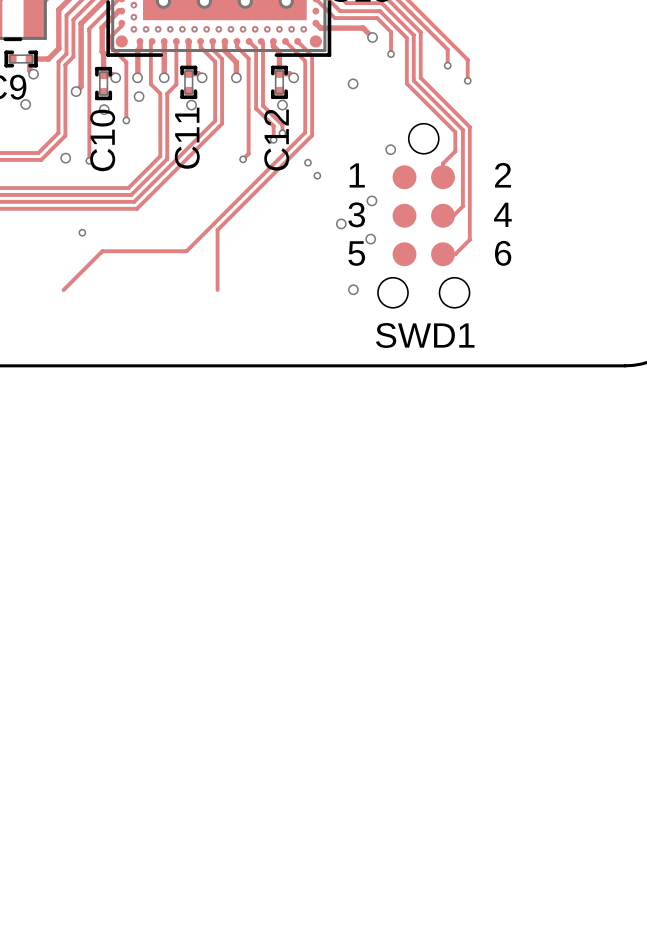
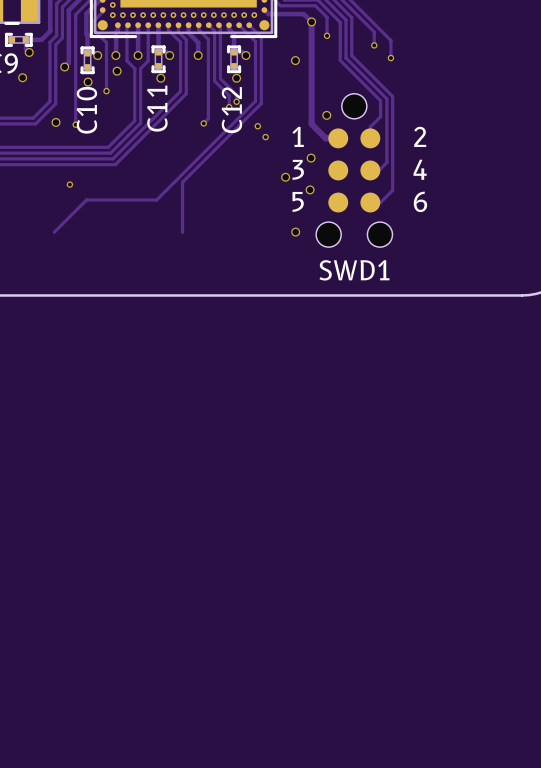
track: none -> (311, 21) (311, 124) (325, 138) (338, 138)

